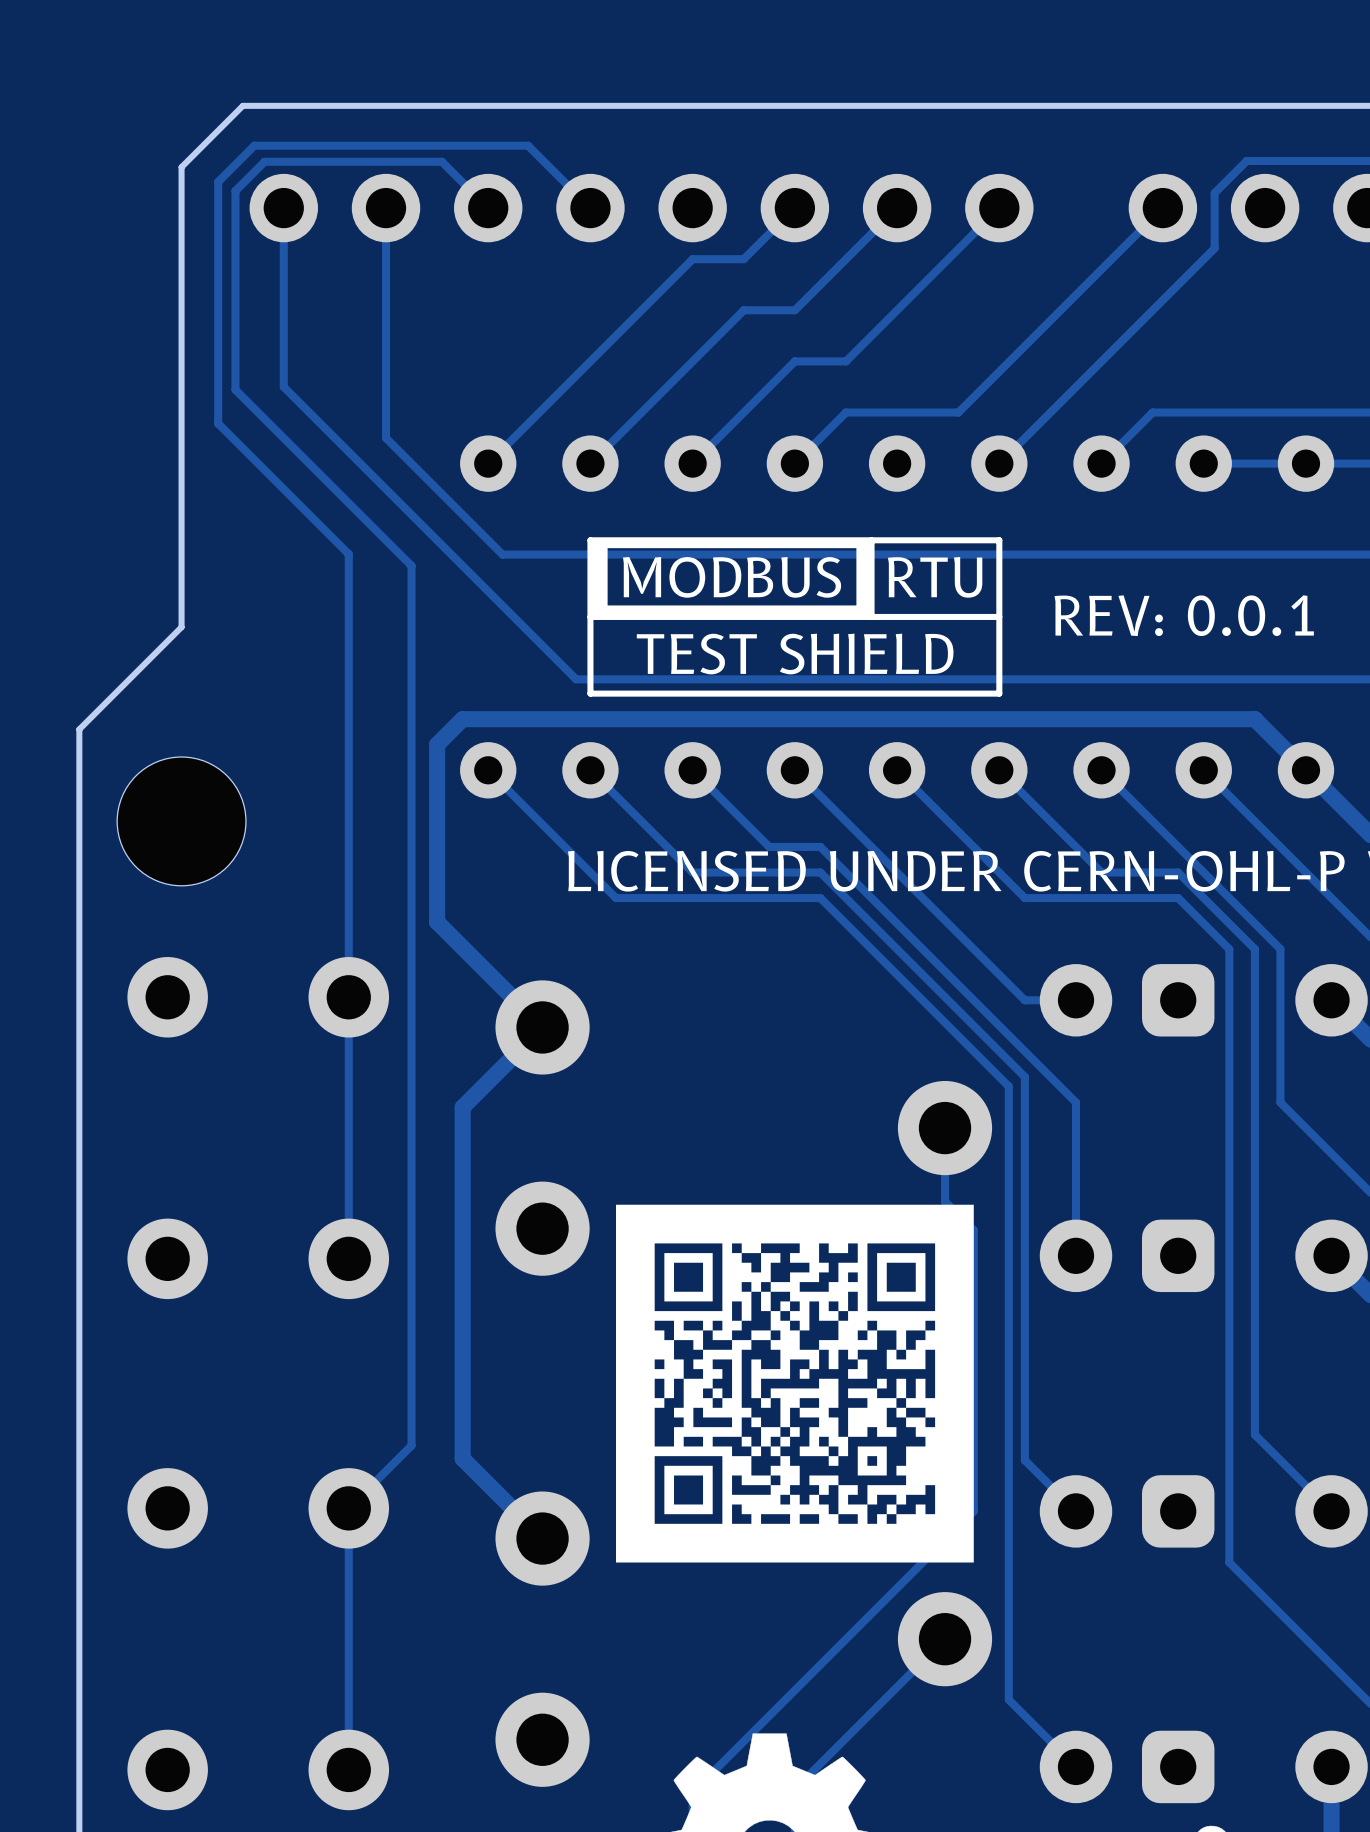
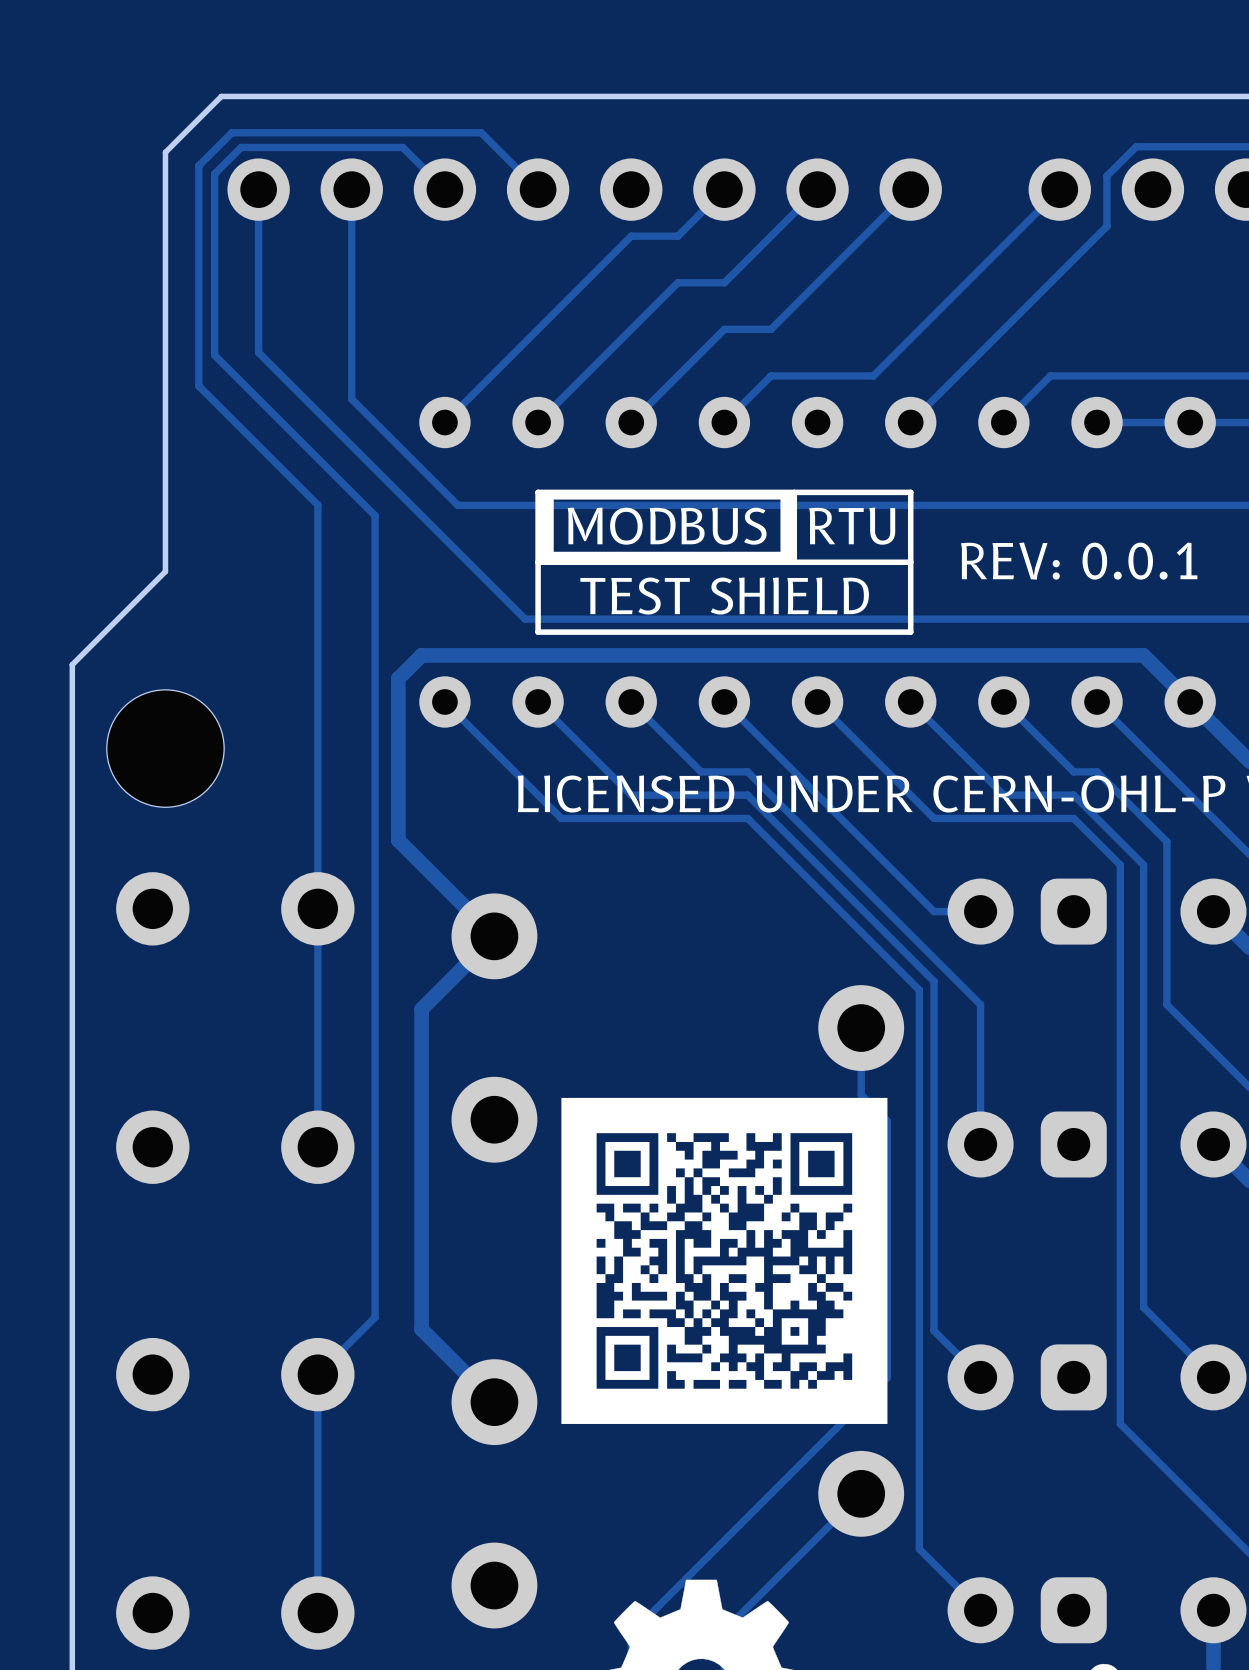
track: (1178, 846) (1280, 949) -> (1073, 771) (1097, 771) (1166, 841) (1166, 865)

